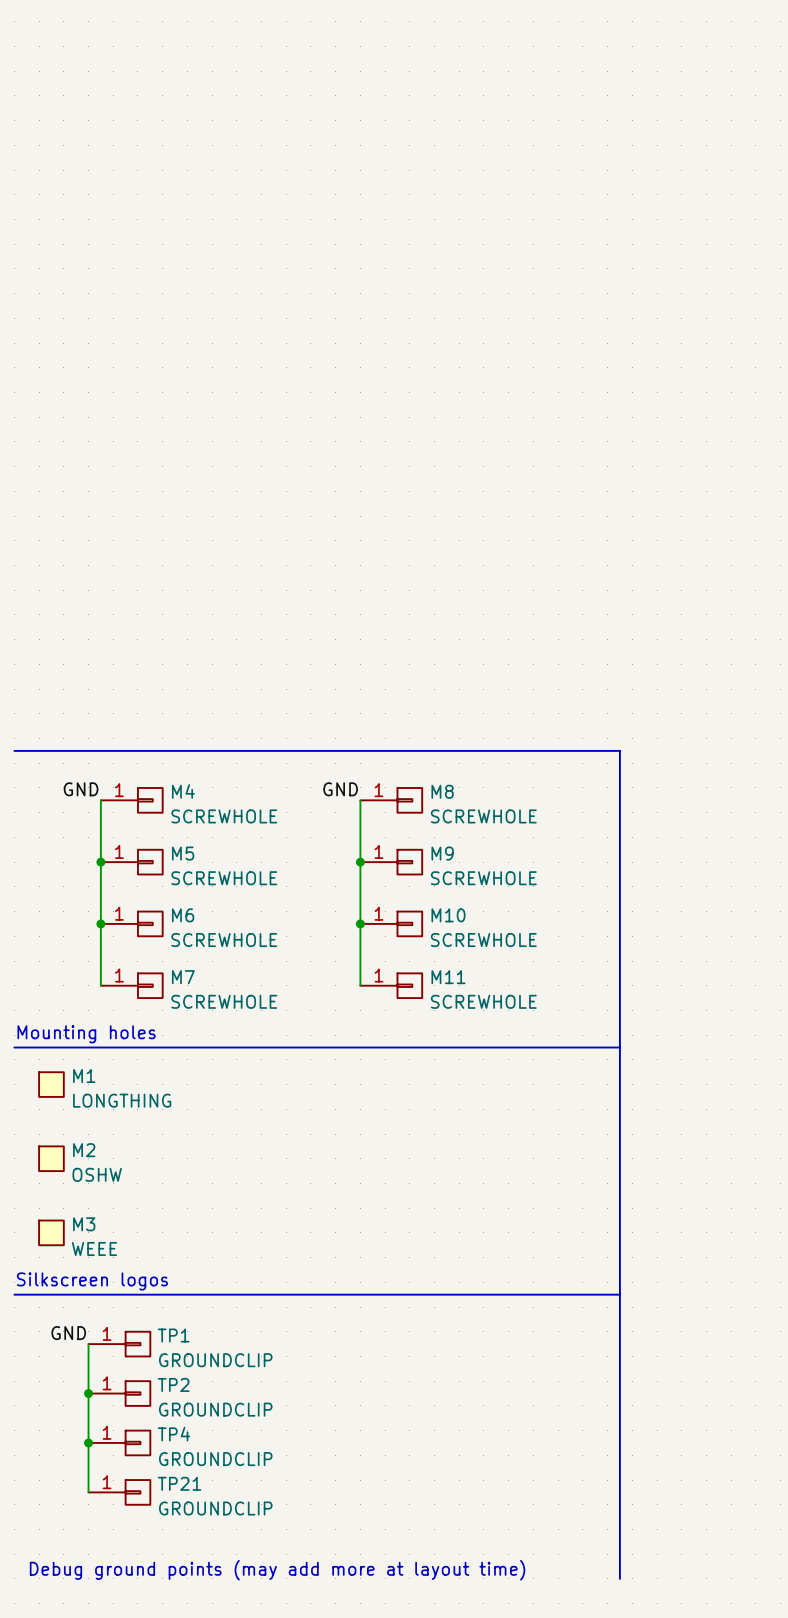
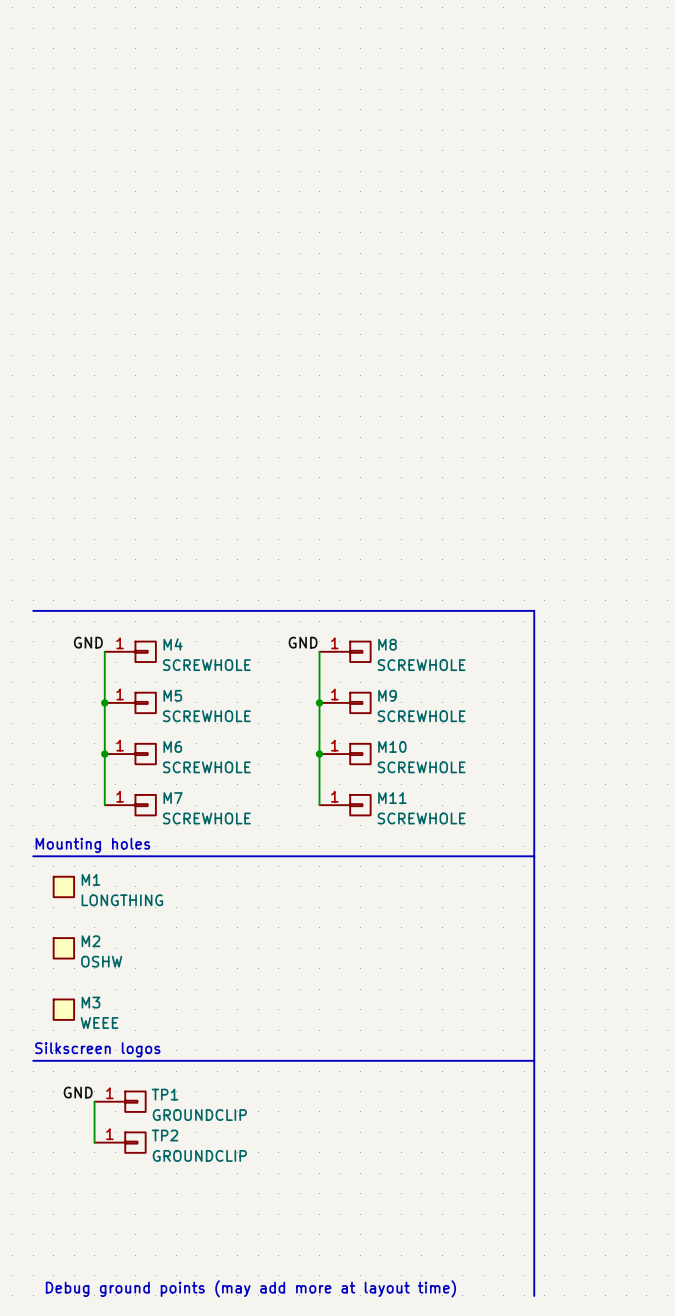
wire: (88, 1393) (88, 1492) -> none
junction: (88, 1393) -> none
junction: (88, 1442) -> none
TP4: GROUNDCLIP (119, 1442) -> none
TP21: GROUNDCLIP (119, 1492) -> none

